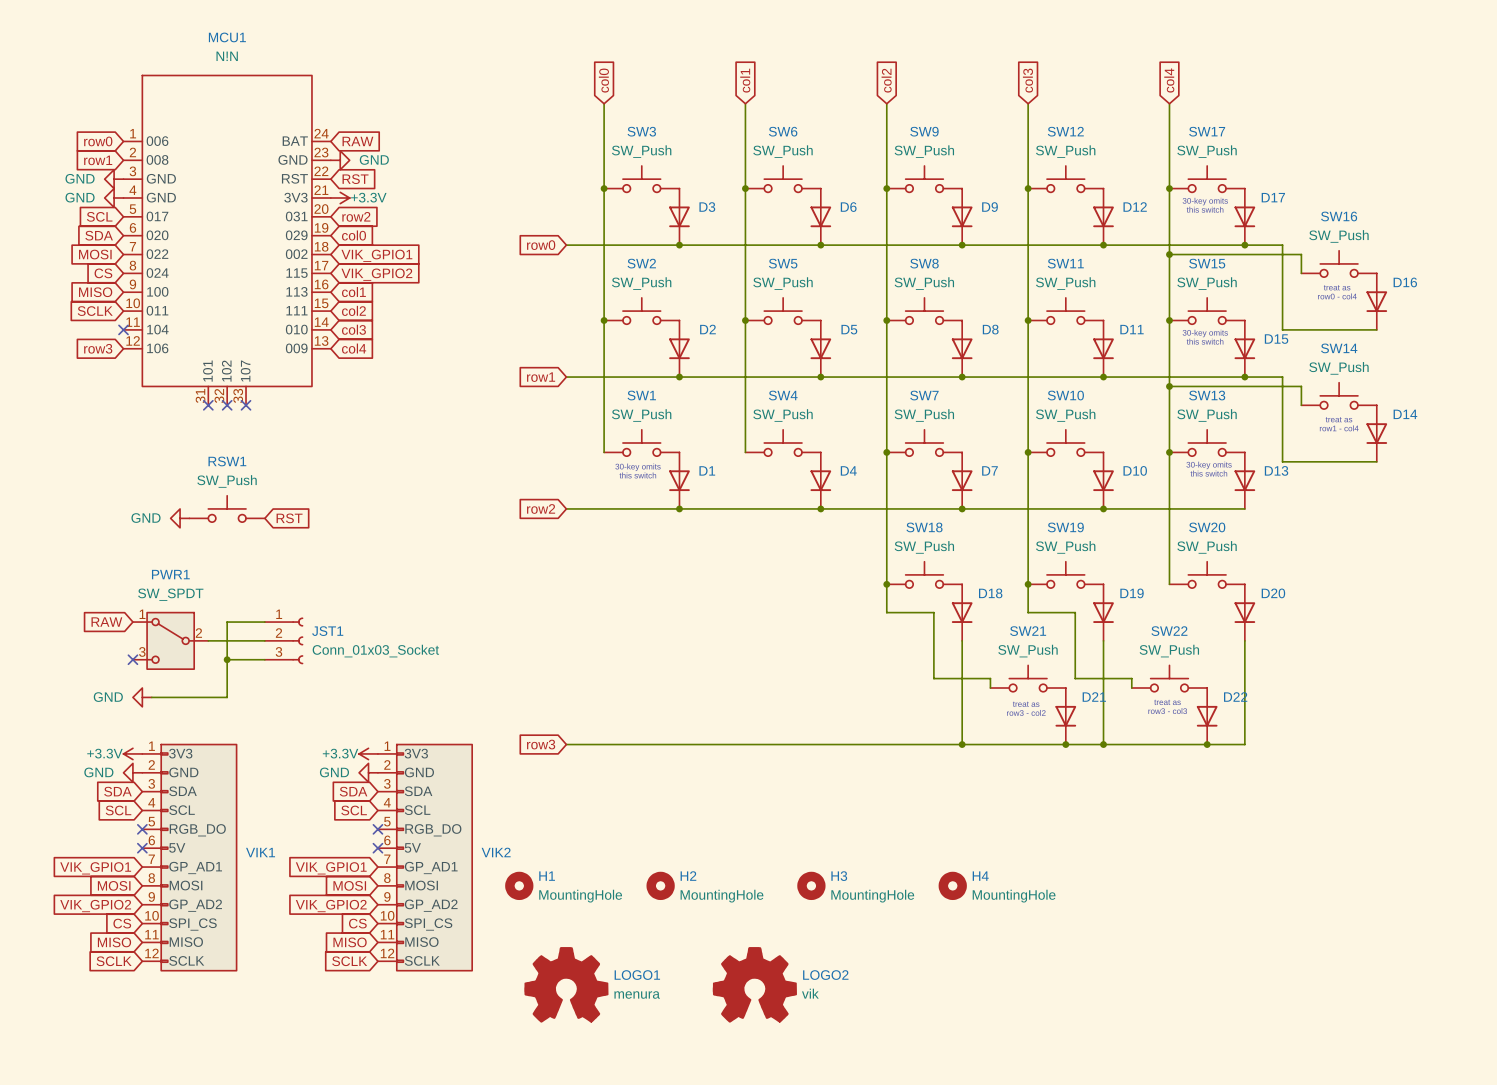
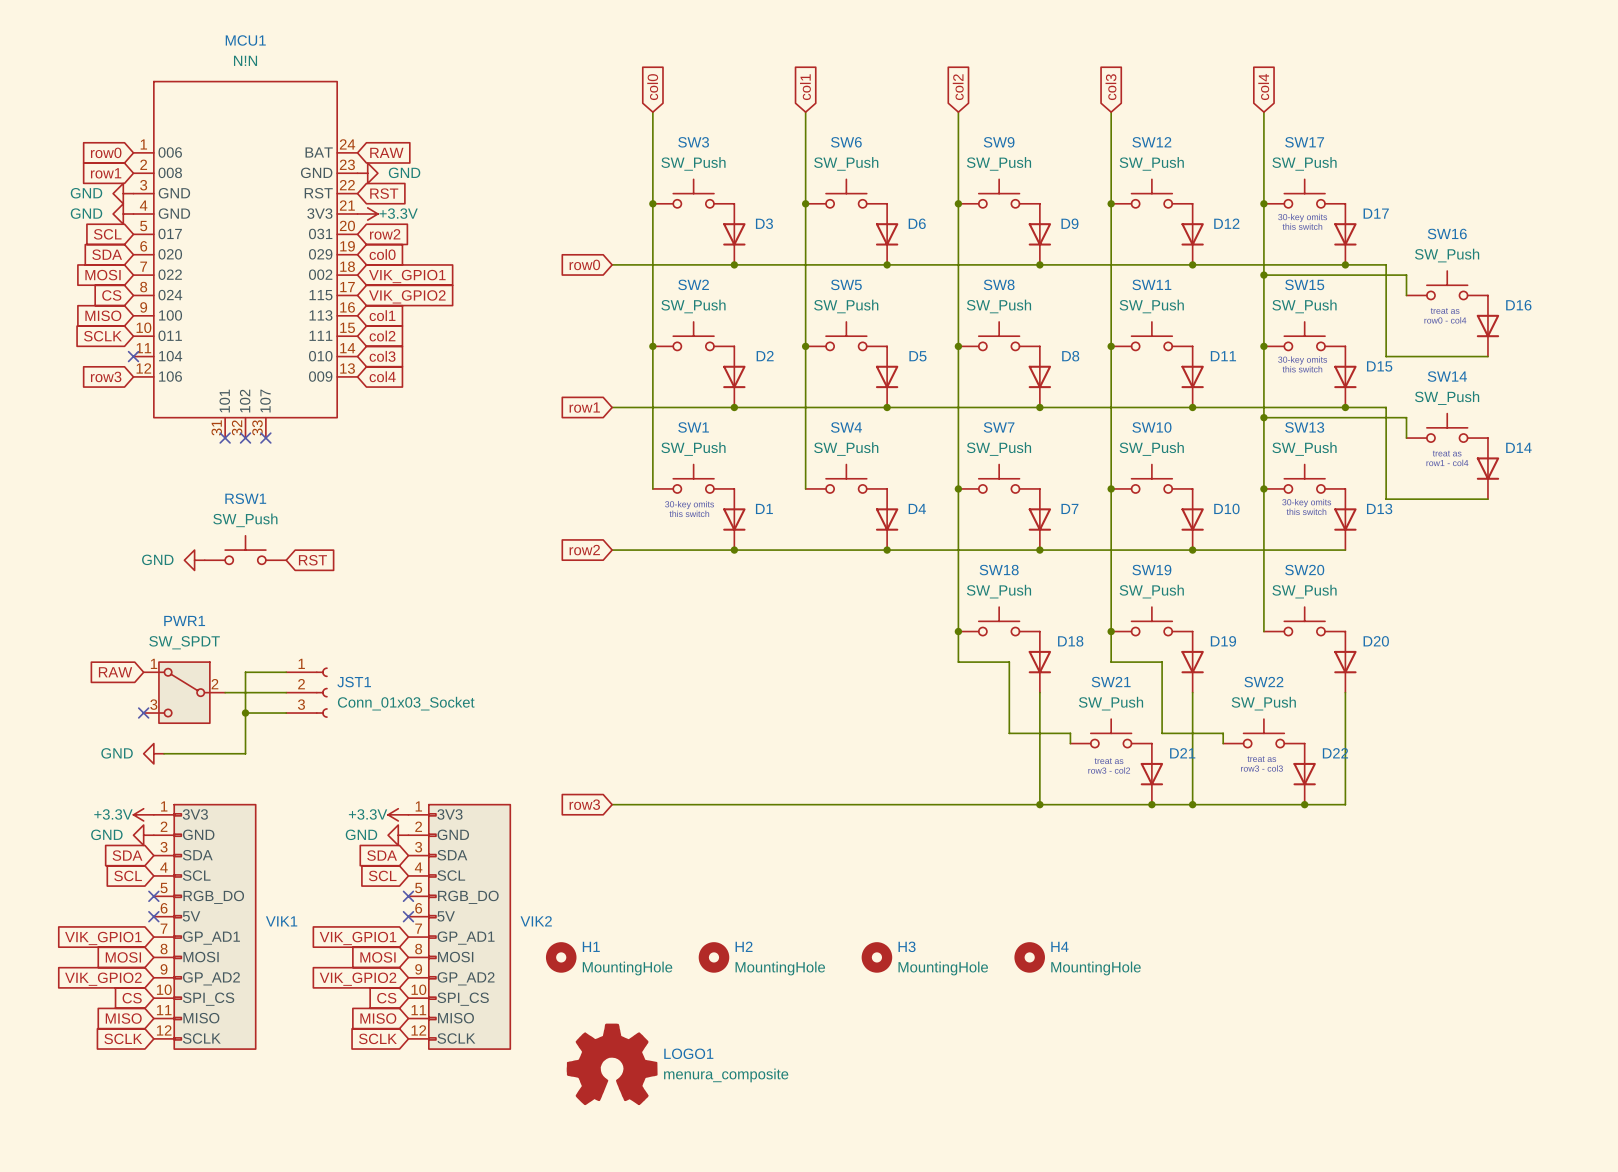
LOGO2: vik (754, 984) -> none
LOGO1 value: menura (637, 994) -> menura_composite (726, 1075)

